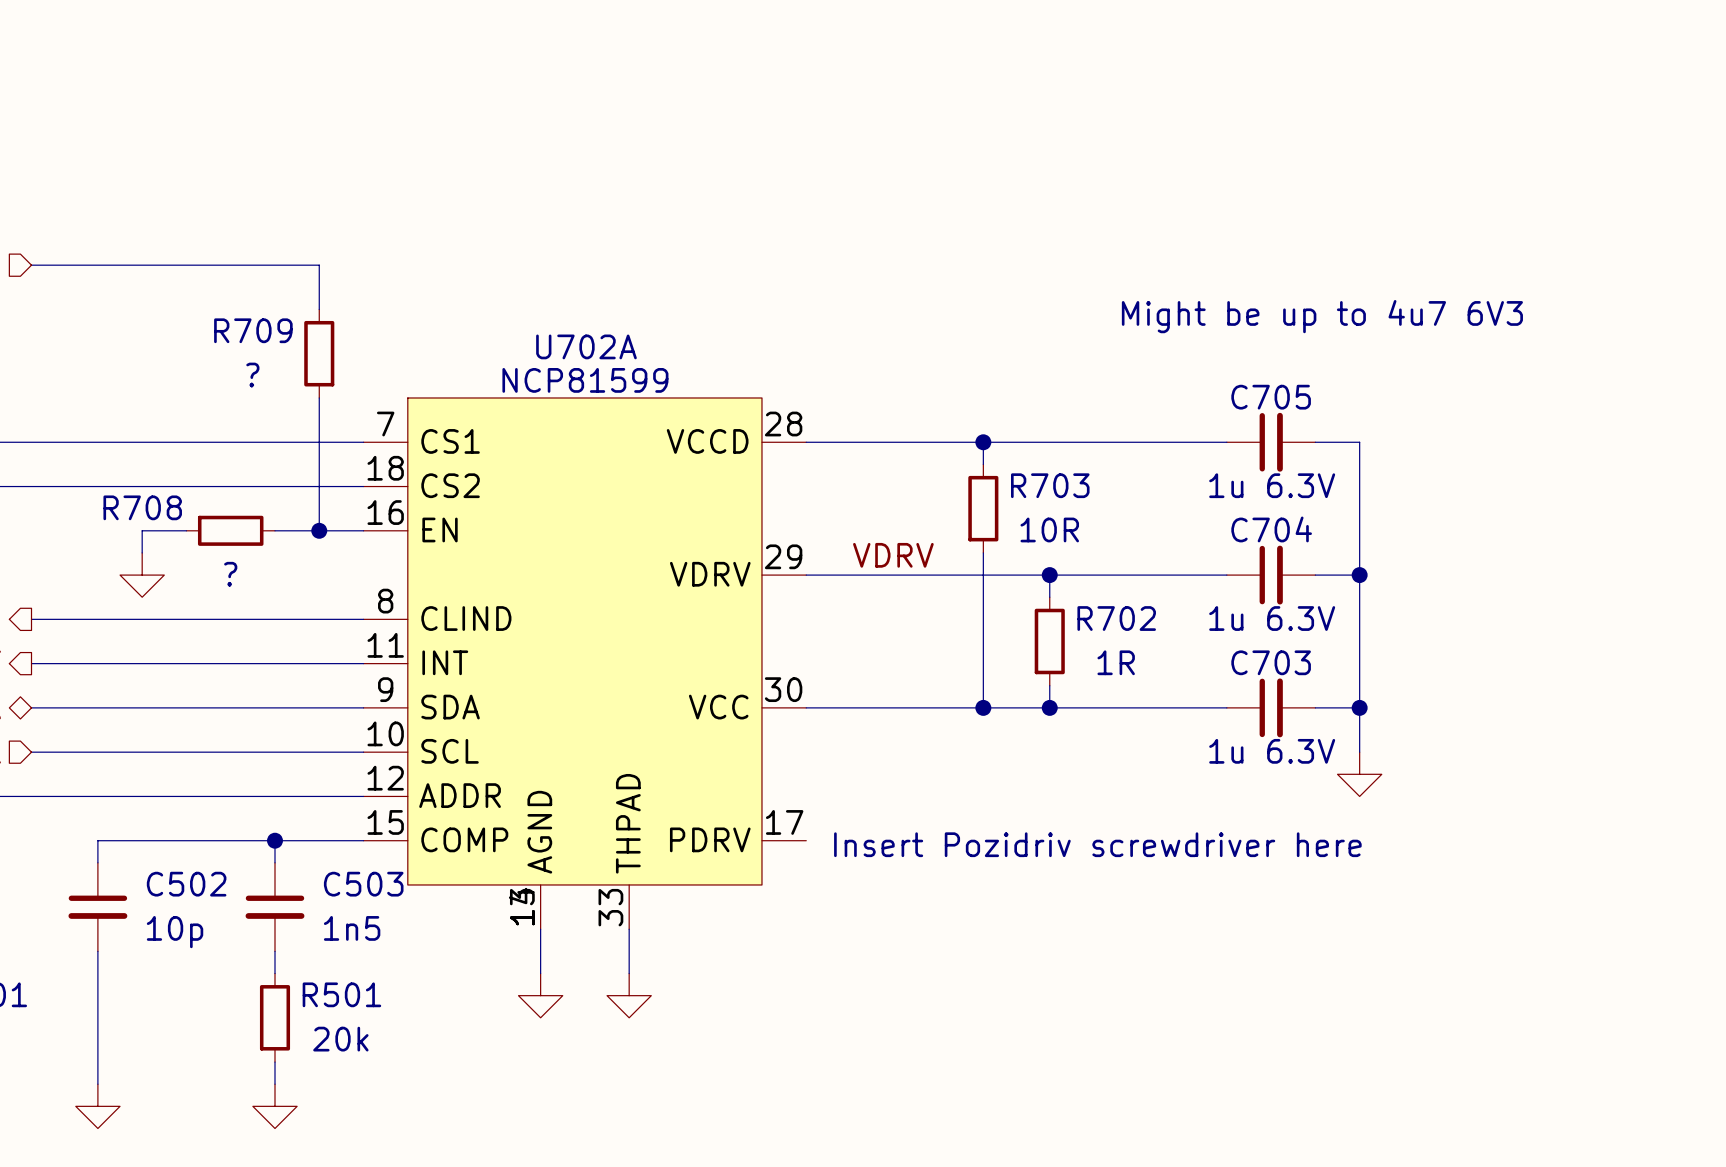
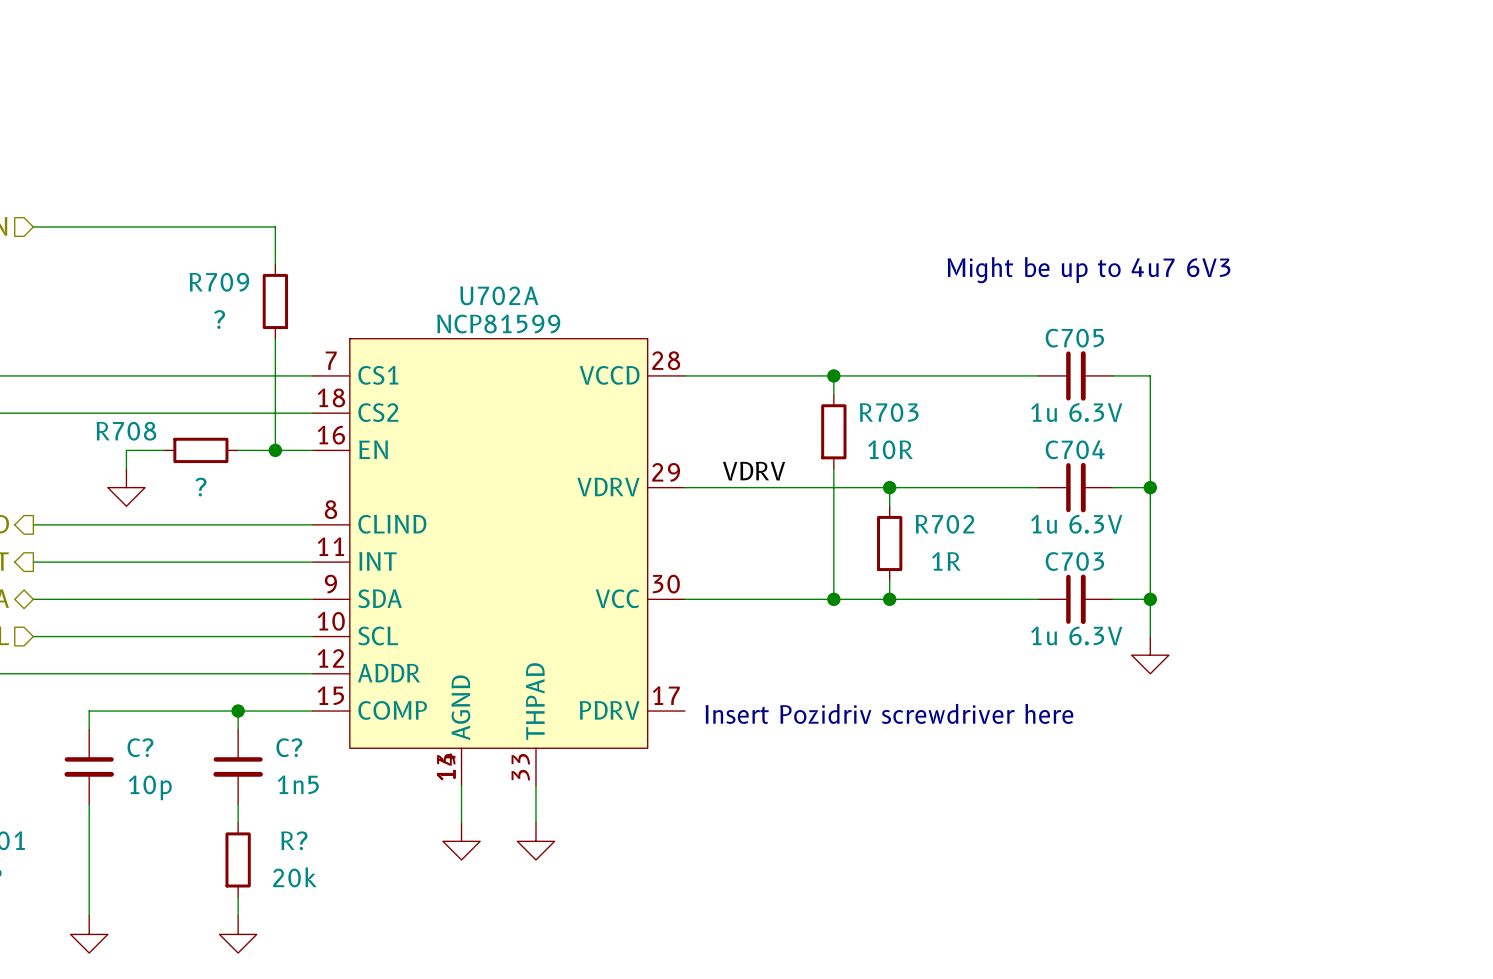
C502 name: C502 (186, 884) -> C? (140, 747)
C503 name: C503 (363, 884) -> C? (289, 747)
R501 name: R501 (341, 994) -> R? (294, 840)

